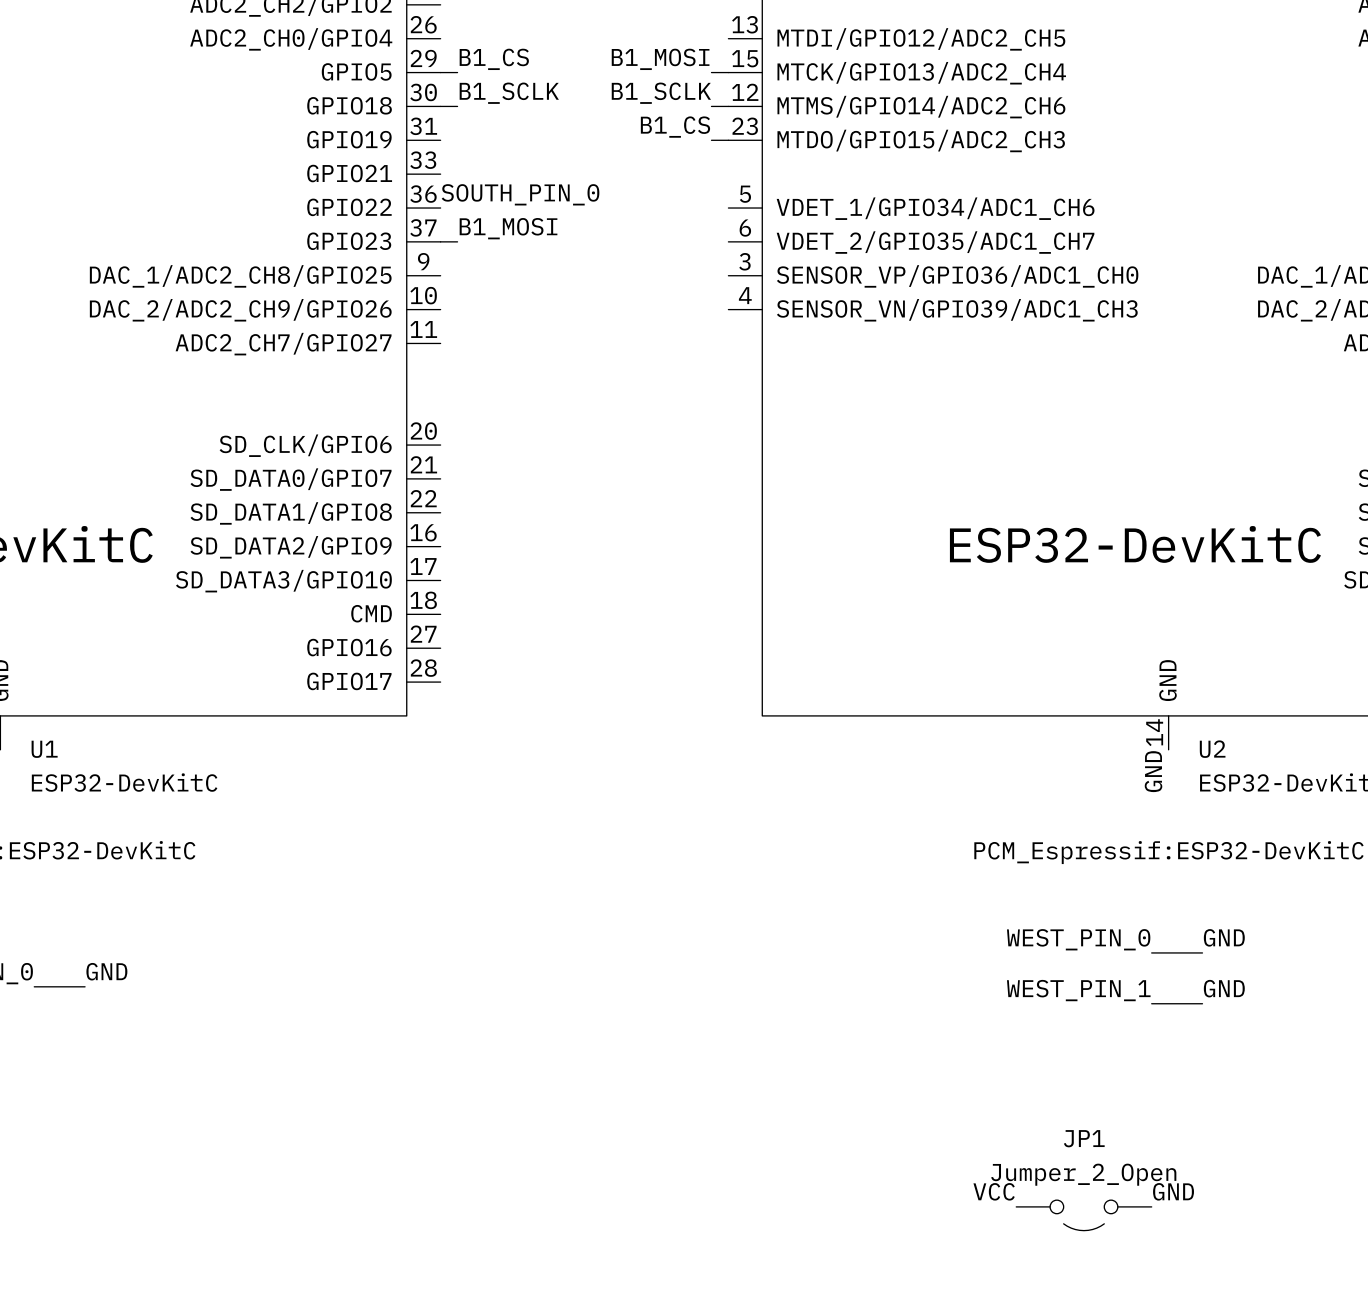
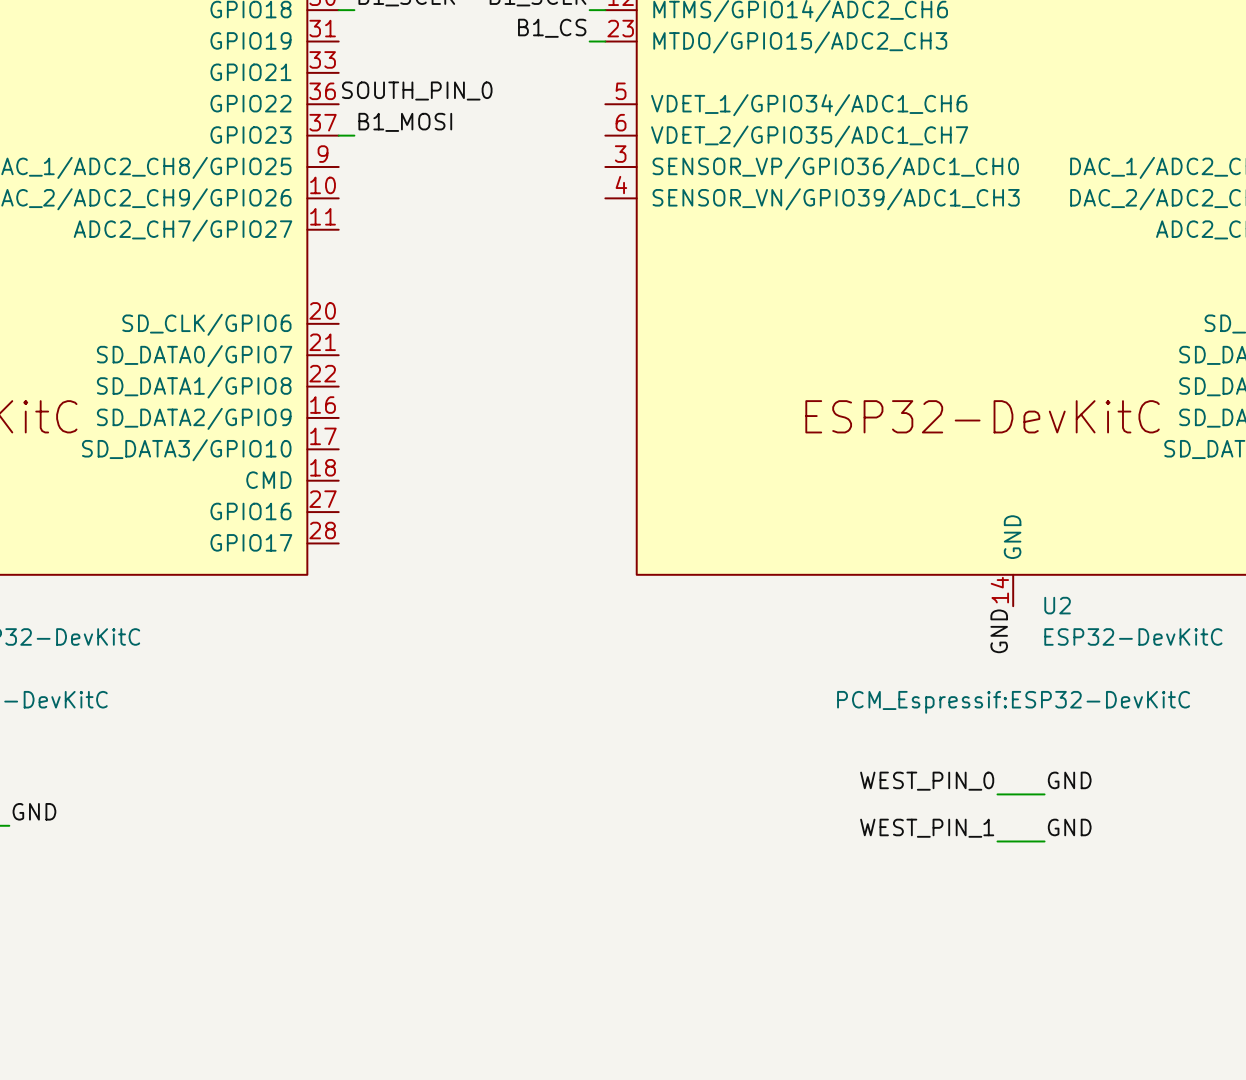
label: VCC (994, 1191) -> none
label: GND (1173, 1191) -> none
JP1: Jumper_2_Open (1083, 1215) -> none

